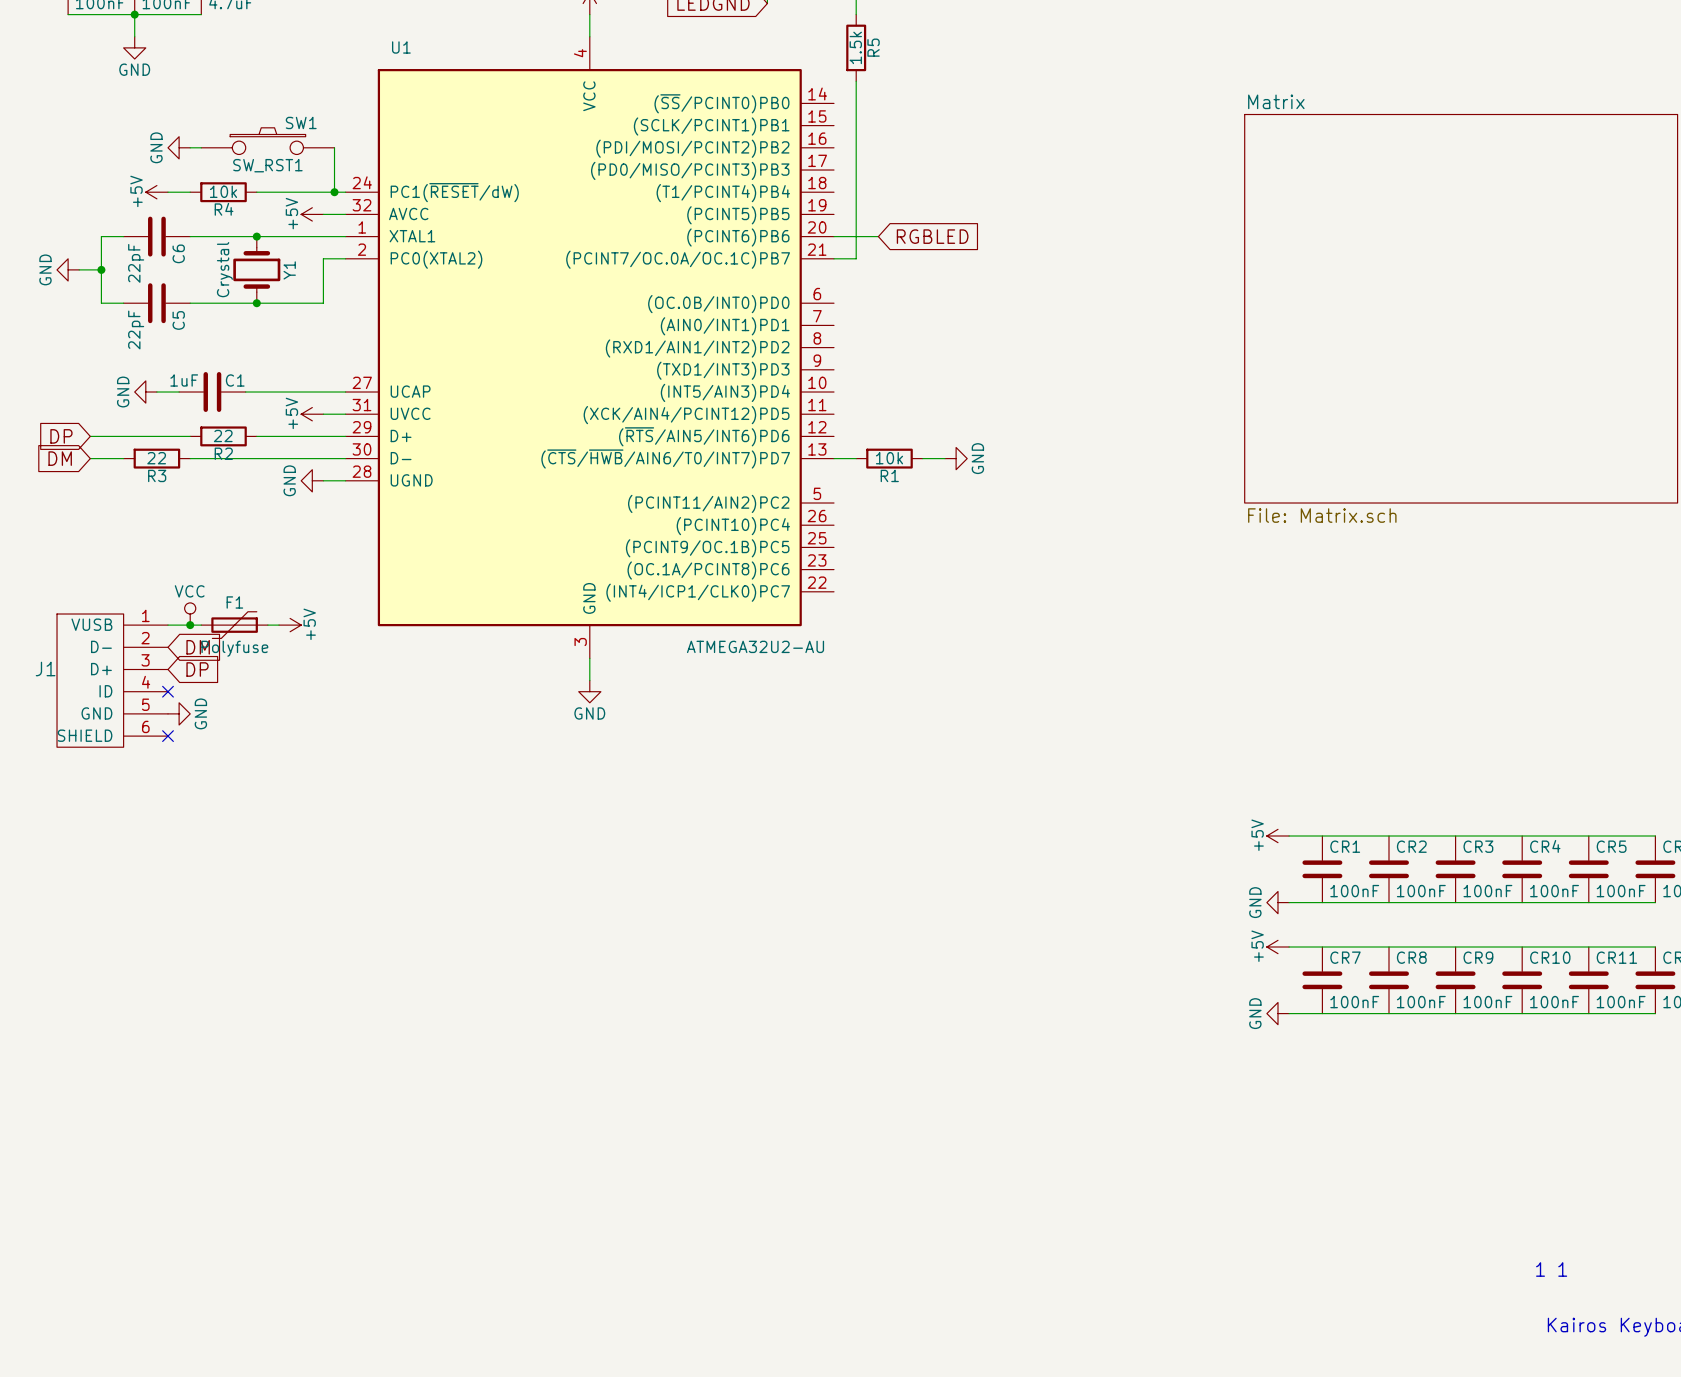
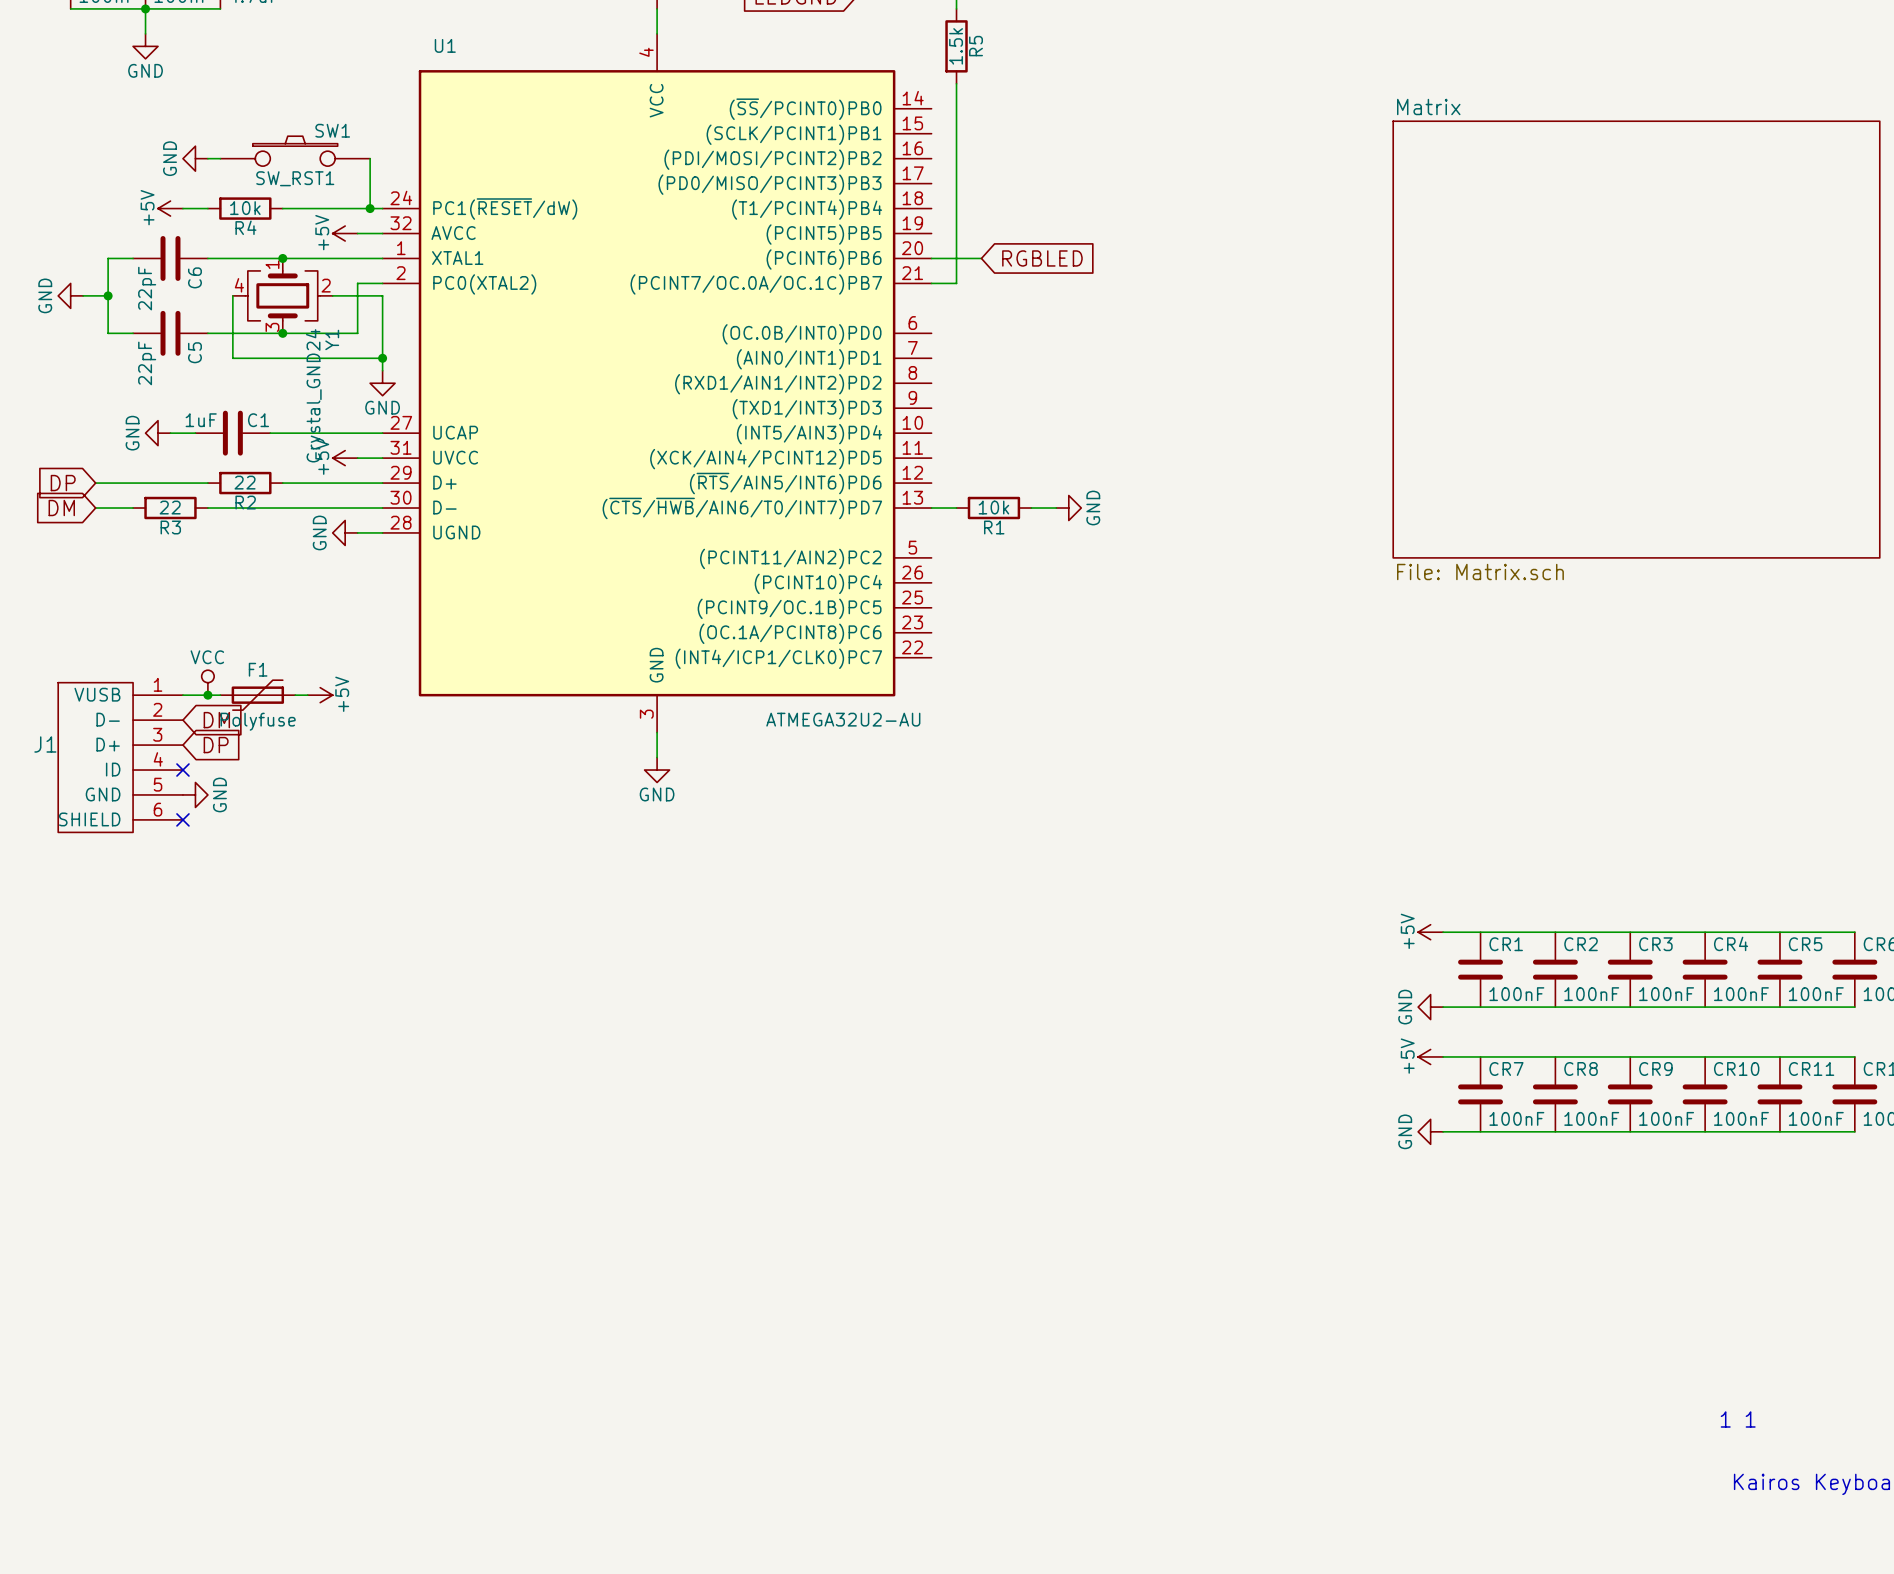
Y1 symbol: [233, 236, 281, 304] -> [232, 258, 333, 334]
wire: none -> (232, 295) (232, 358) (382, 358)
Y1 value: Crystal (224, 269) -> Crystal_GND24 (315, 395)
wire: none -> (332, 295) (382, 295) (382, 370)
Y1 name position: Y1 (289, 270) -> Y1 (332, 339)
junction: none -> (382, 358)
power symbol: none -> GND (382, 383)

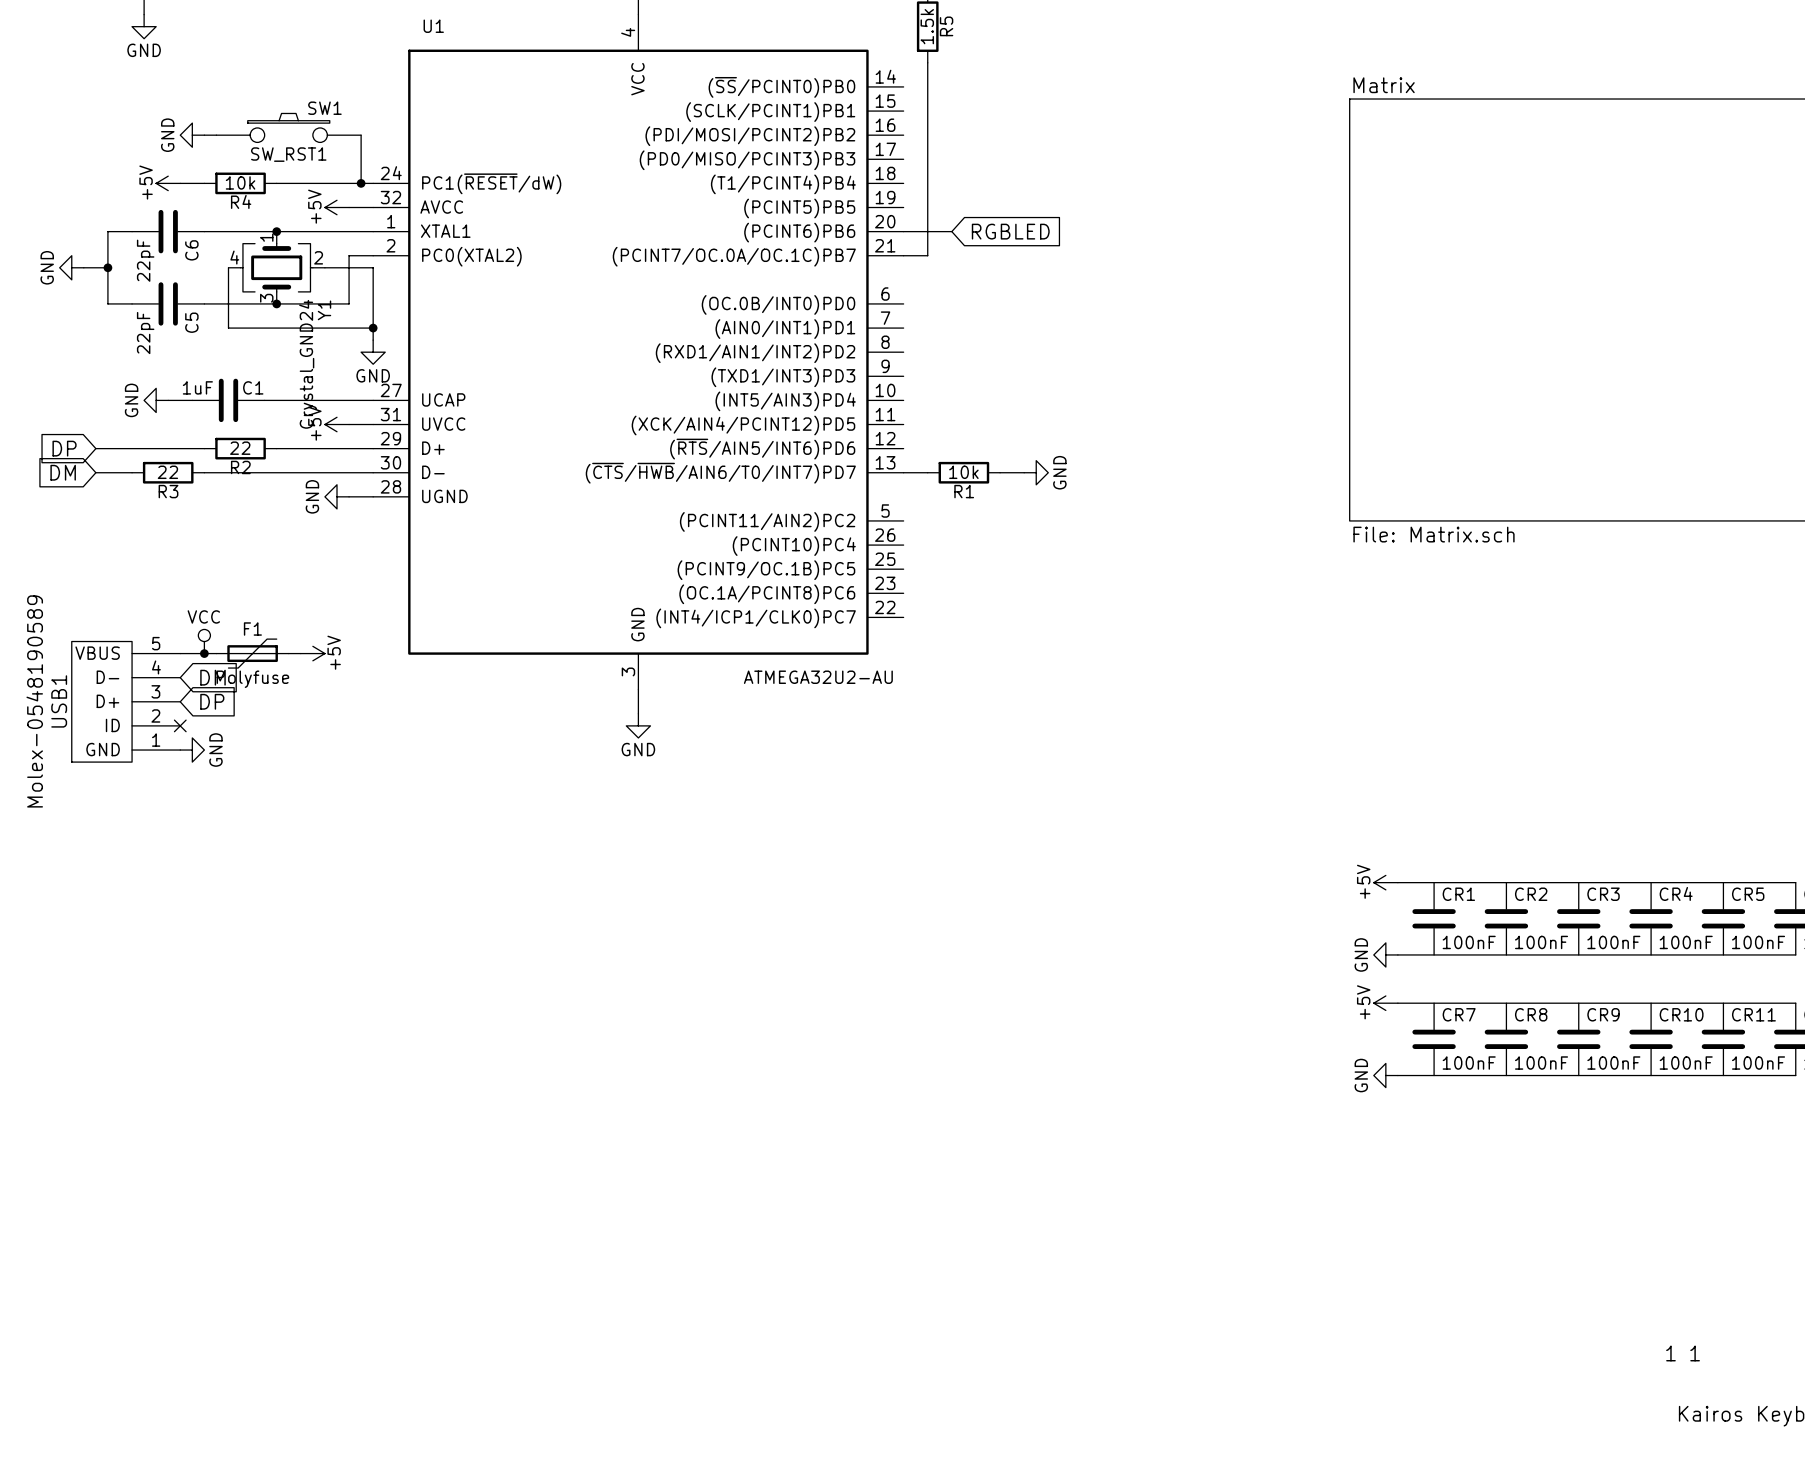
USB1: none -> Molex-0548190589 (126, 701)
J1: (120, 757) -> none
no-connect mark: (182, 819) -> none

